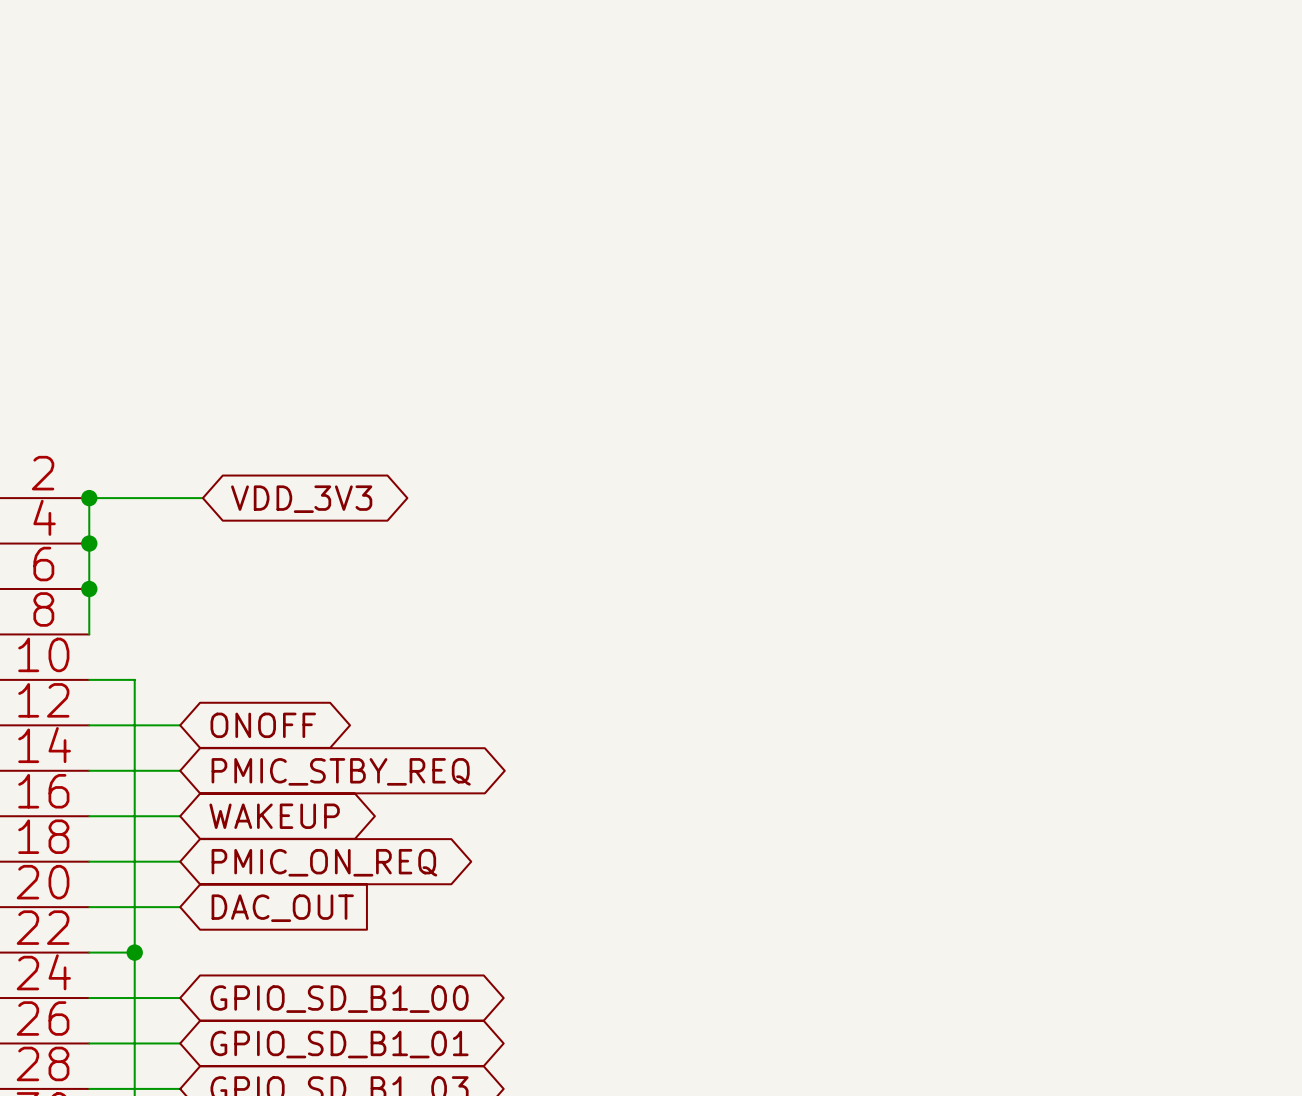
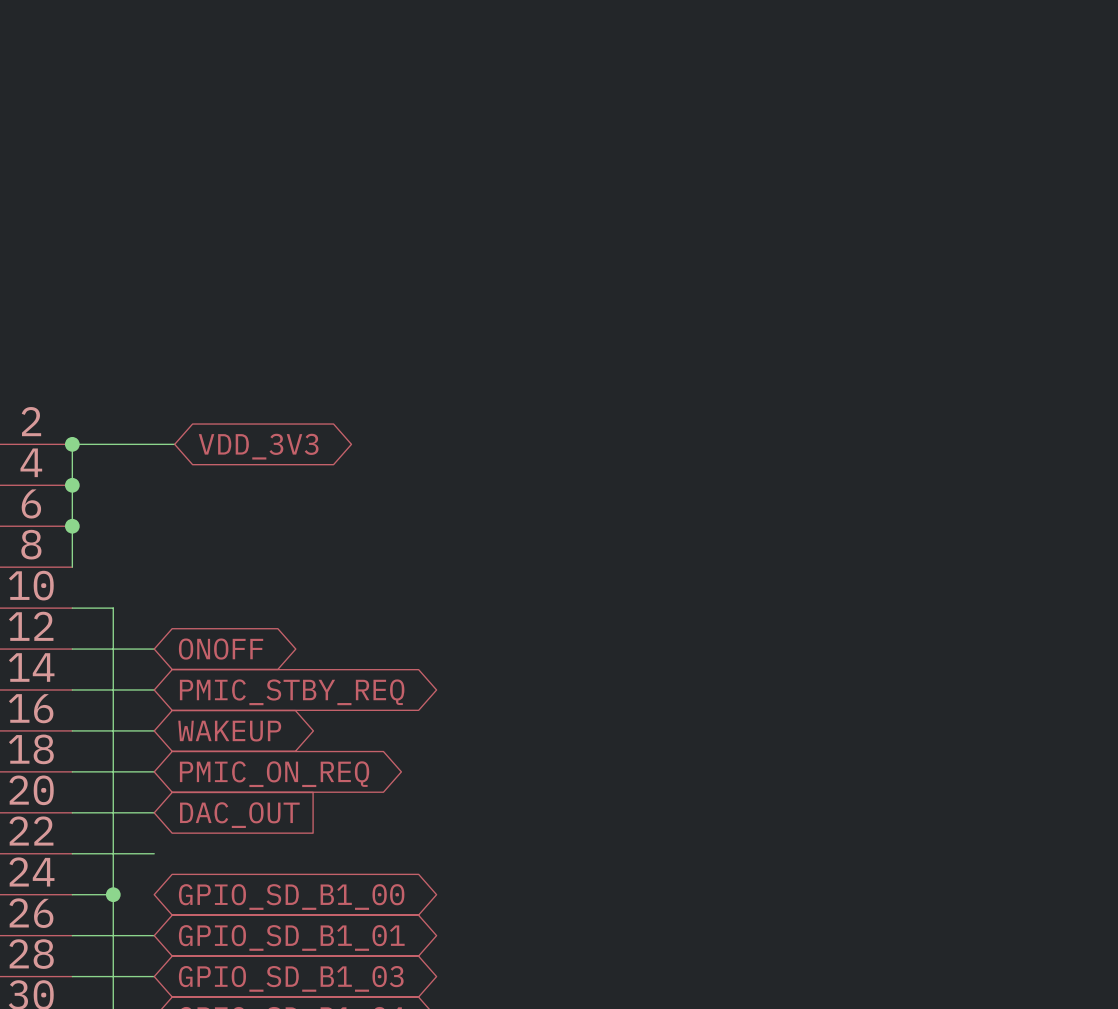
junction position: (134, 952) -> (113, 894)
wire: (134, 998) (180, 998) -> (113, 853) (154, 853)

